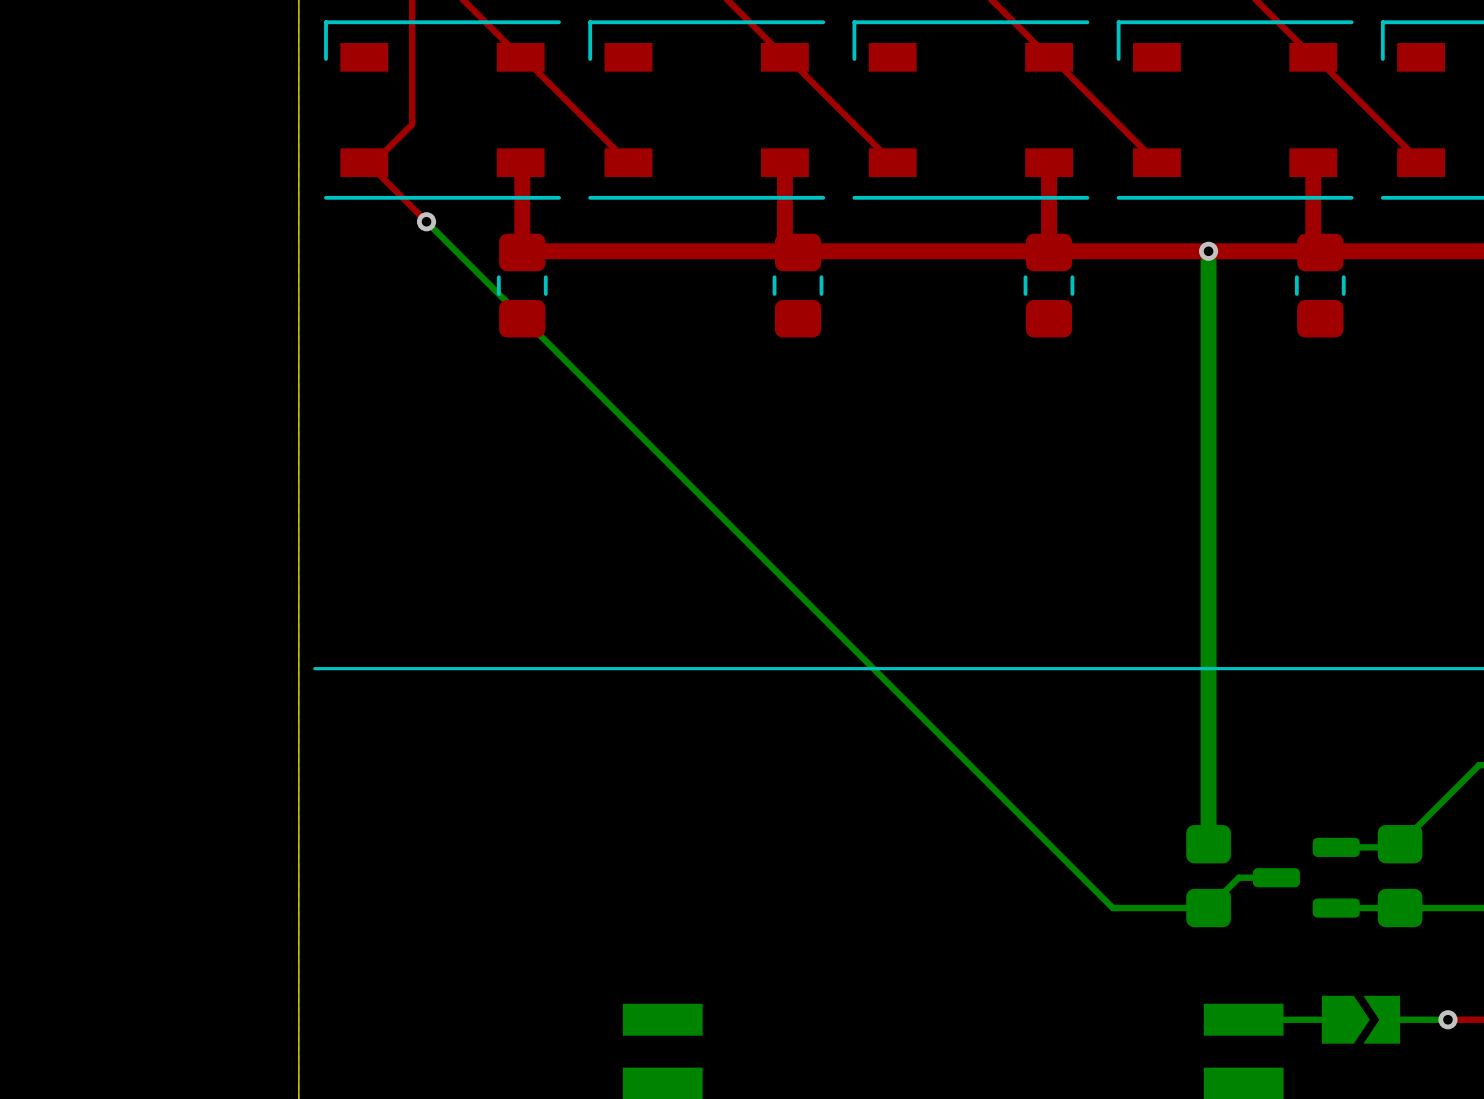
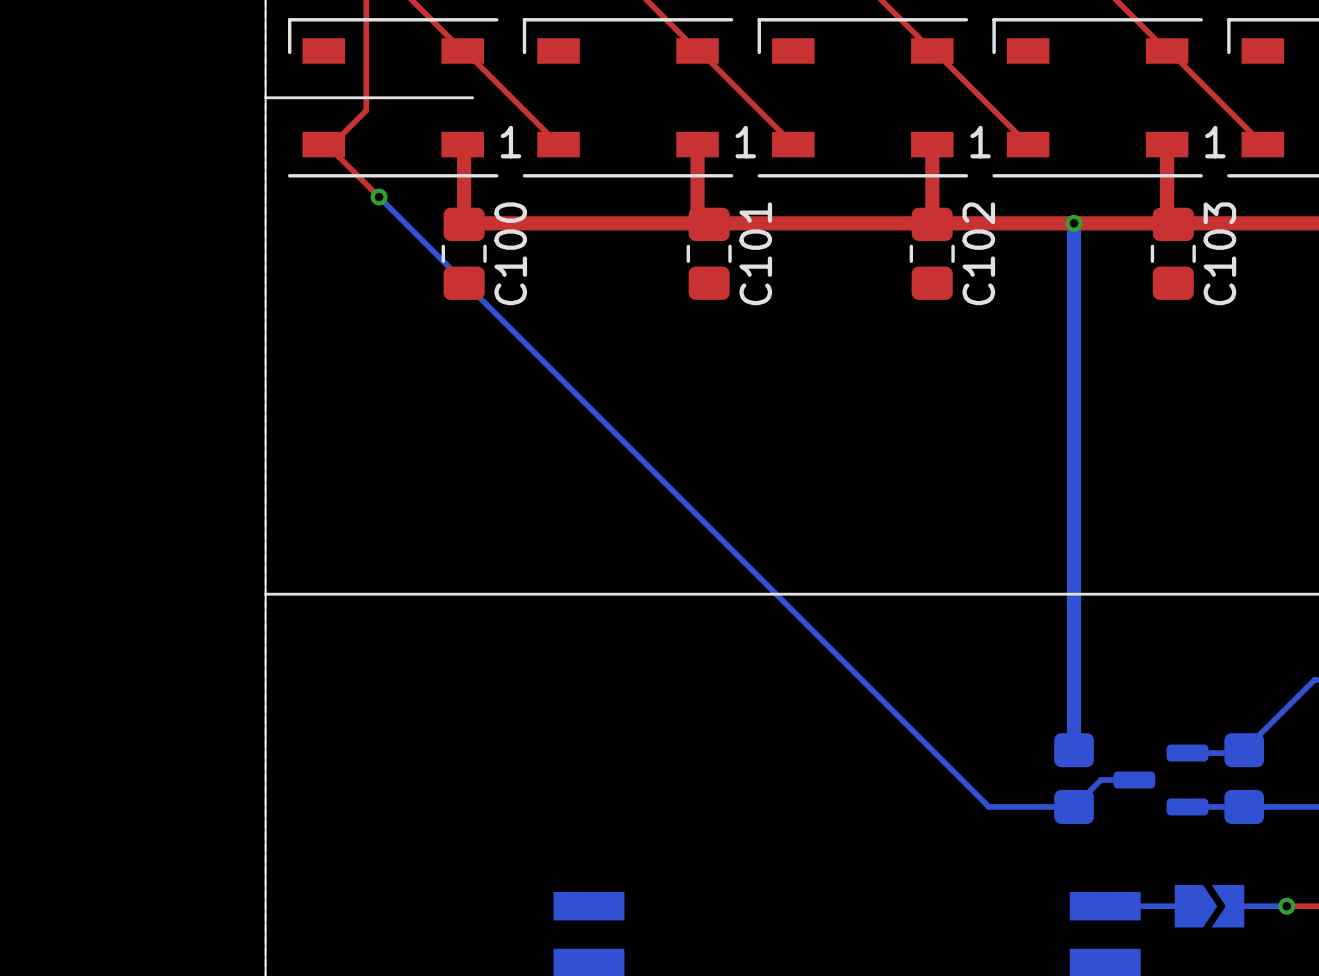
line: none -> (265, 97) (472, 97)
part text: none -> 1 (510, 142)
part text: none -> 1 (745, 142)
part text: none -> 1 (980, 142)
part text: none -> 1 (1215, 142)
C100 name: none -> C100 (510, 253)
C101 name: none -> C101 (755, 253)
C102 name: none -> C102 (978, 253)
C103 name: none -> C103 (1219, 253)
line: none -> (265, 594) (279, 594)

